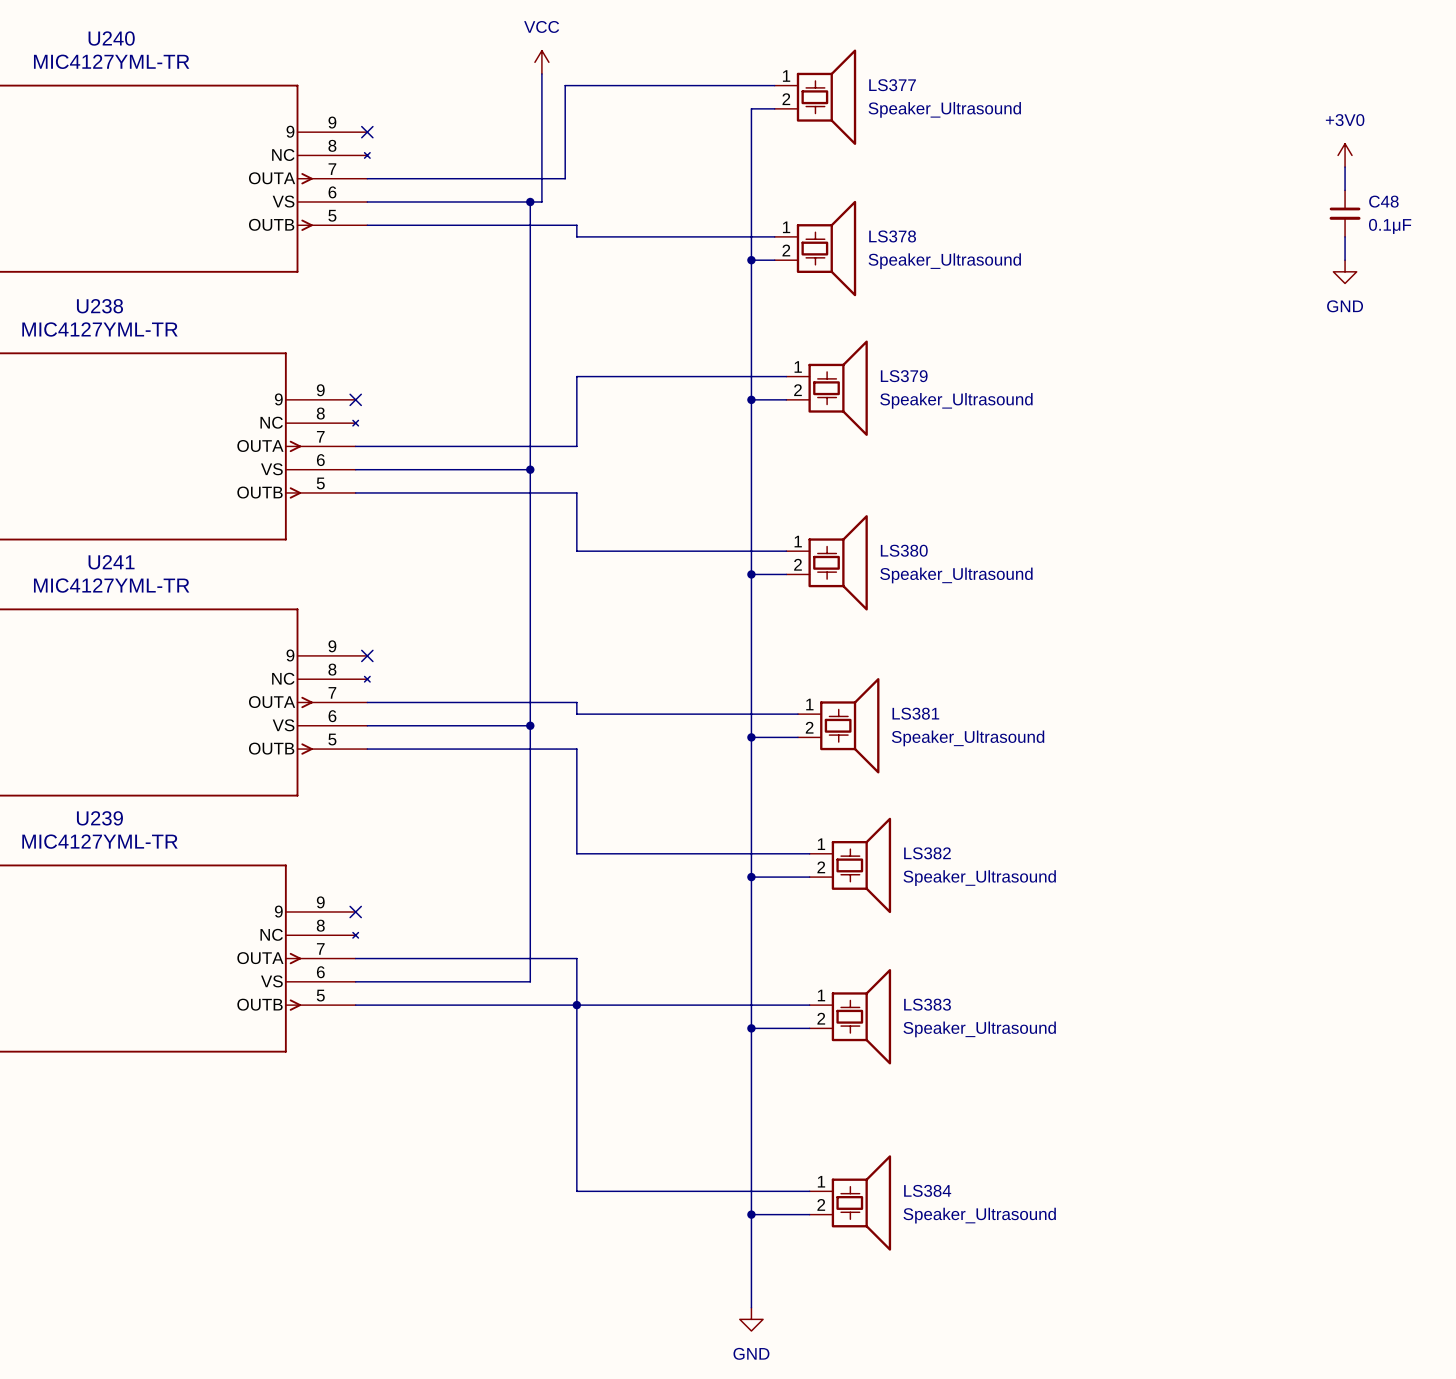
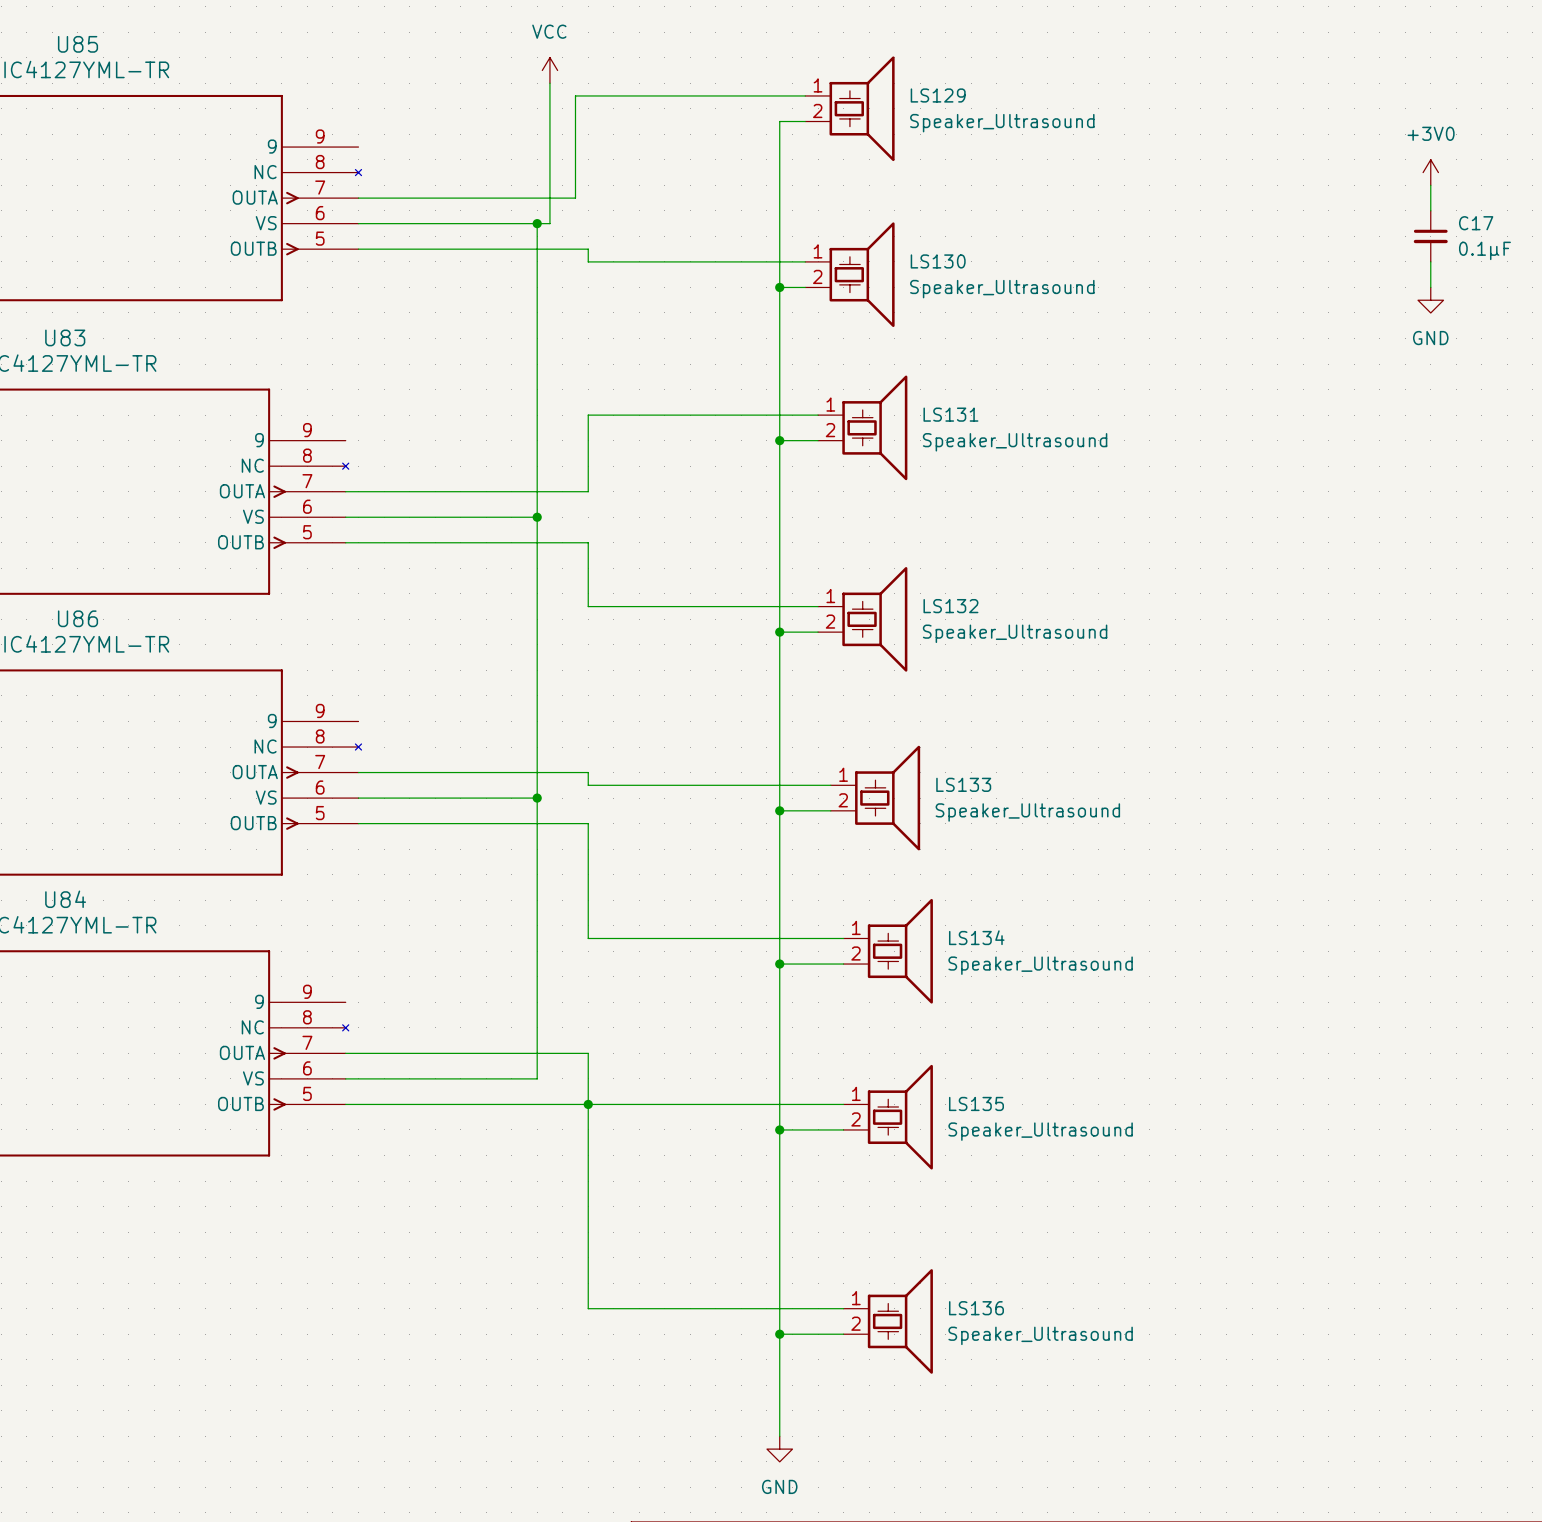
U240 name: U240 (111, 38) -> U85 (78, 44)
LS377 name: LS377 (892, 85) -> LS129 (938, 95)
no-connect mark: (367, 132) -> none
C48 name: C48 (1383, 201) -> C17 (1476, 223)
LS378 name: LS378 (892, 236) -> LS130 (938, 261)
U238 name: U238 (99, 306) -> U83 (65, 337)
LS379 name: LS379 (904, 376) -> LS131 (950, 414)
no-connect mark: (355, 399) -> none
LS380 name: LS380 (904, 550) -> LS132 (950, 606)
U241 name: U241 (111, 562) -> U86 (78, 618)
no-connect mark: (367, 655) -> none
LS381 name: LS381 (915, 713) -> LS133 (963, 784)
U239 name: U239 (99, 818) -> U84 (65, 899)
LS382 name: LS382 (927, 853) -> LS134 (976, 937)
no-connect mark: (355, 911) -> none
LS383 name: LS383 (927, 1004) -> LS135 (976, 1103)
LS384 name: LS384 (927, 1190) -> LS136 (976, 1308)

